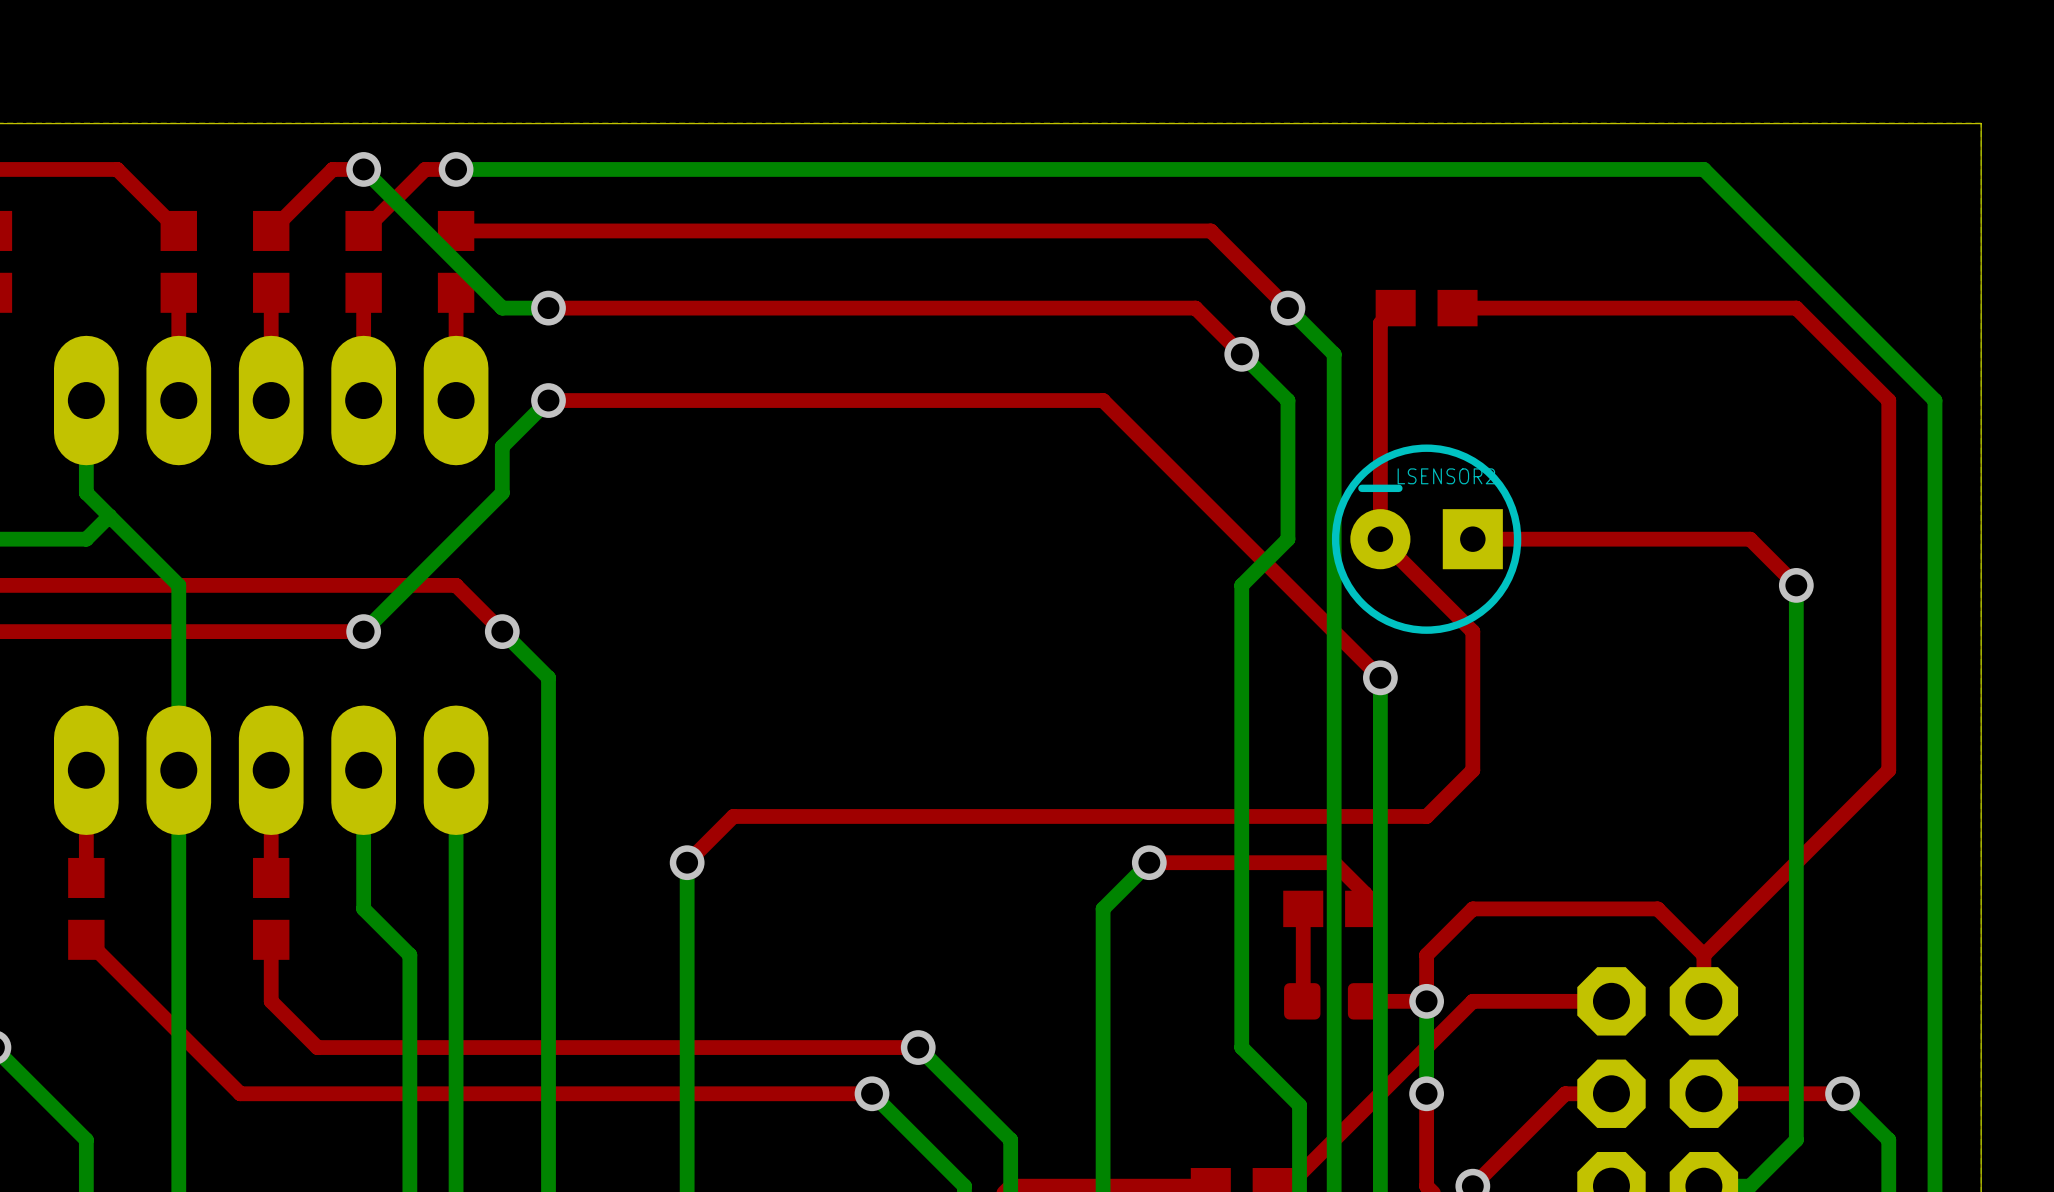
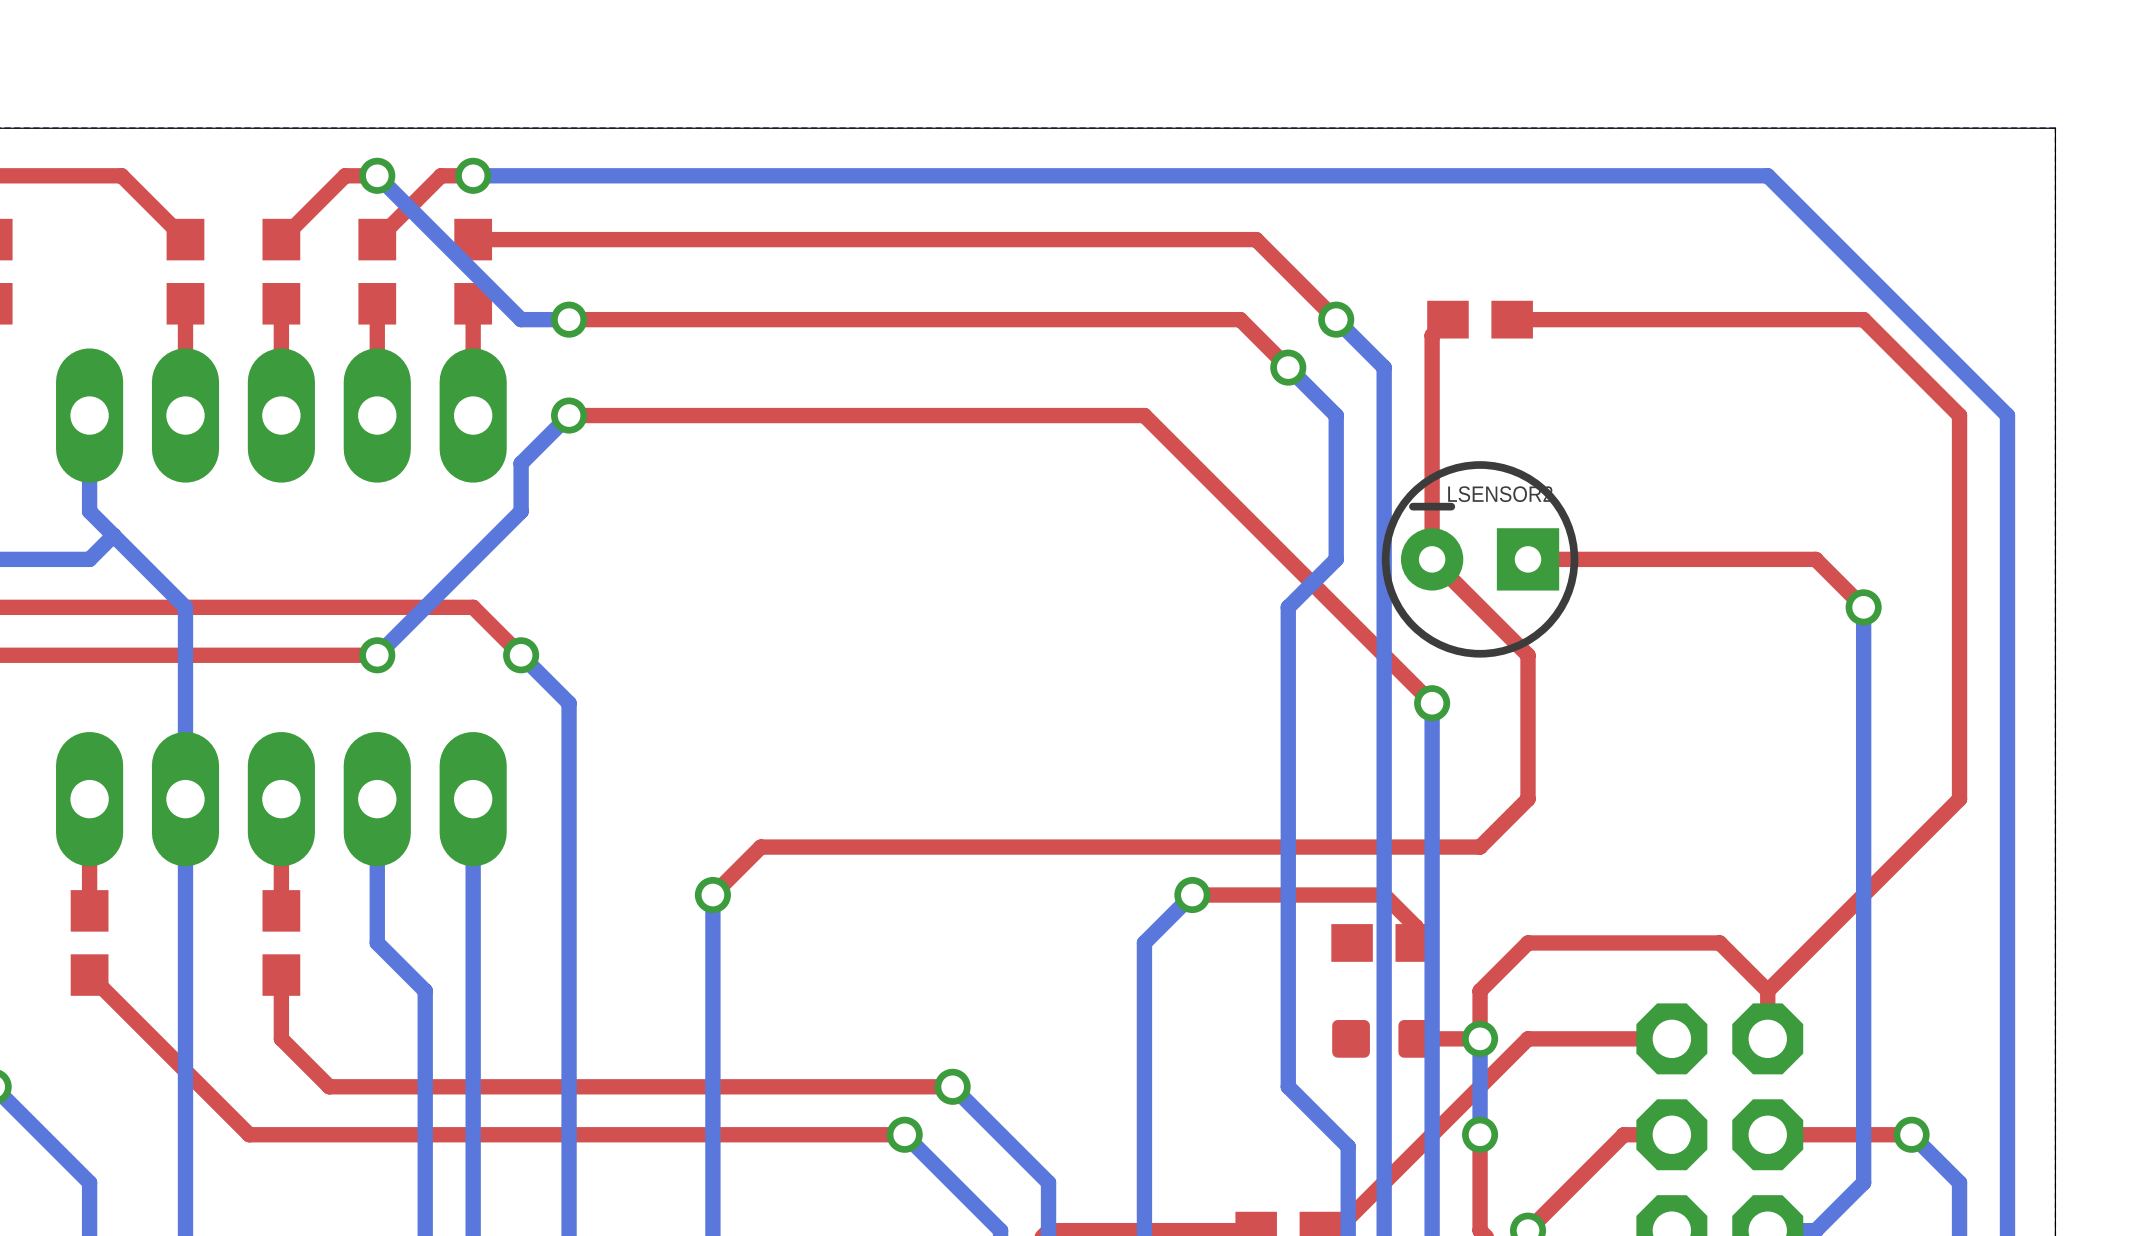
top track: (1303, 908) (1302, 1001) -> none

